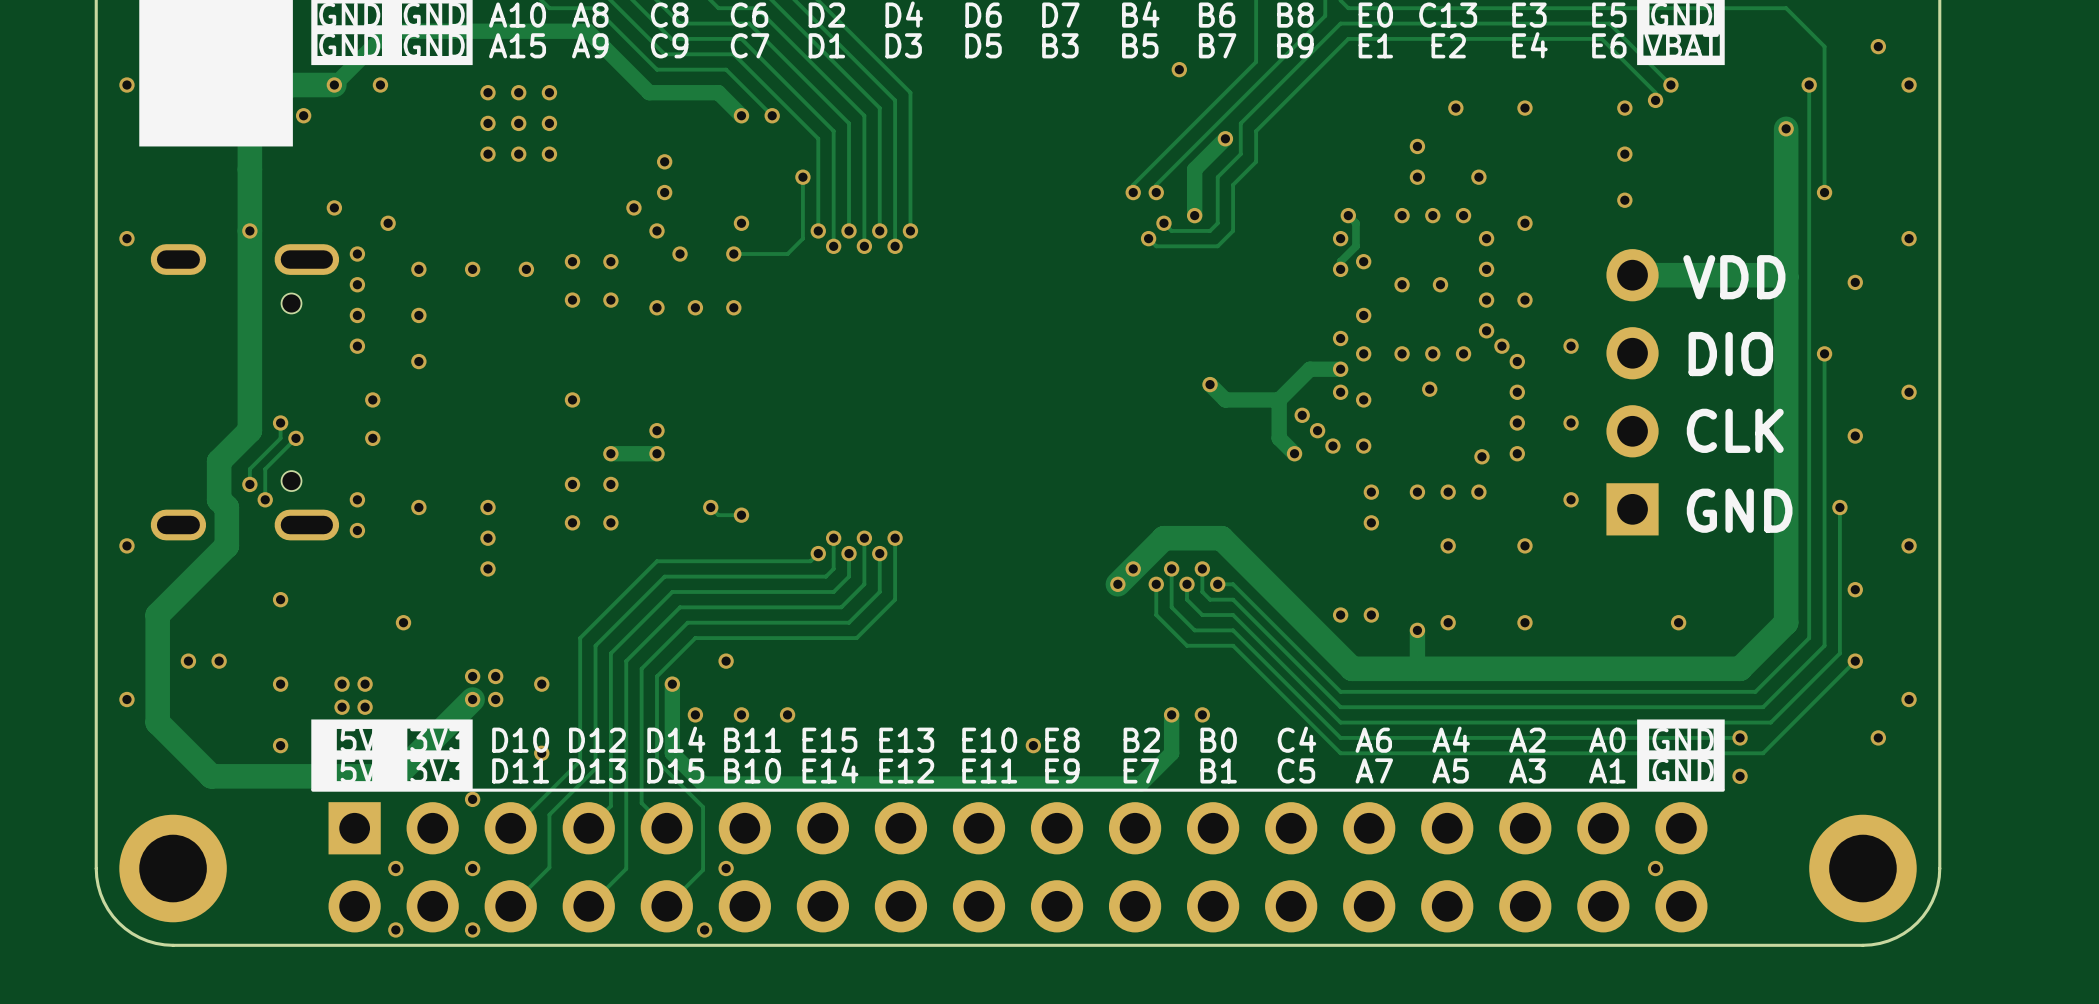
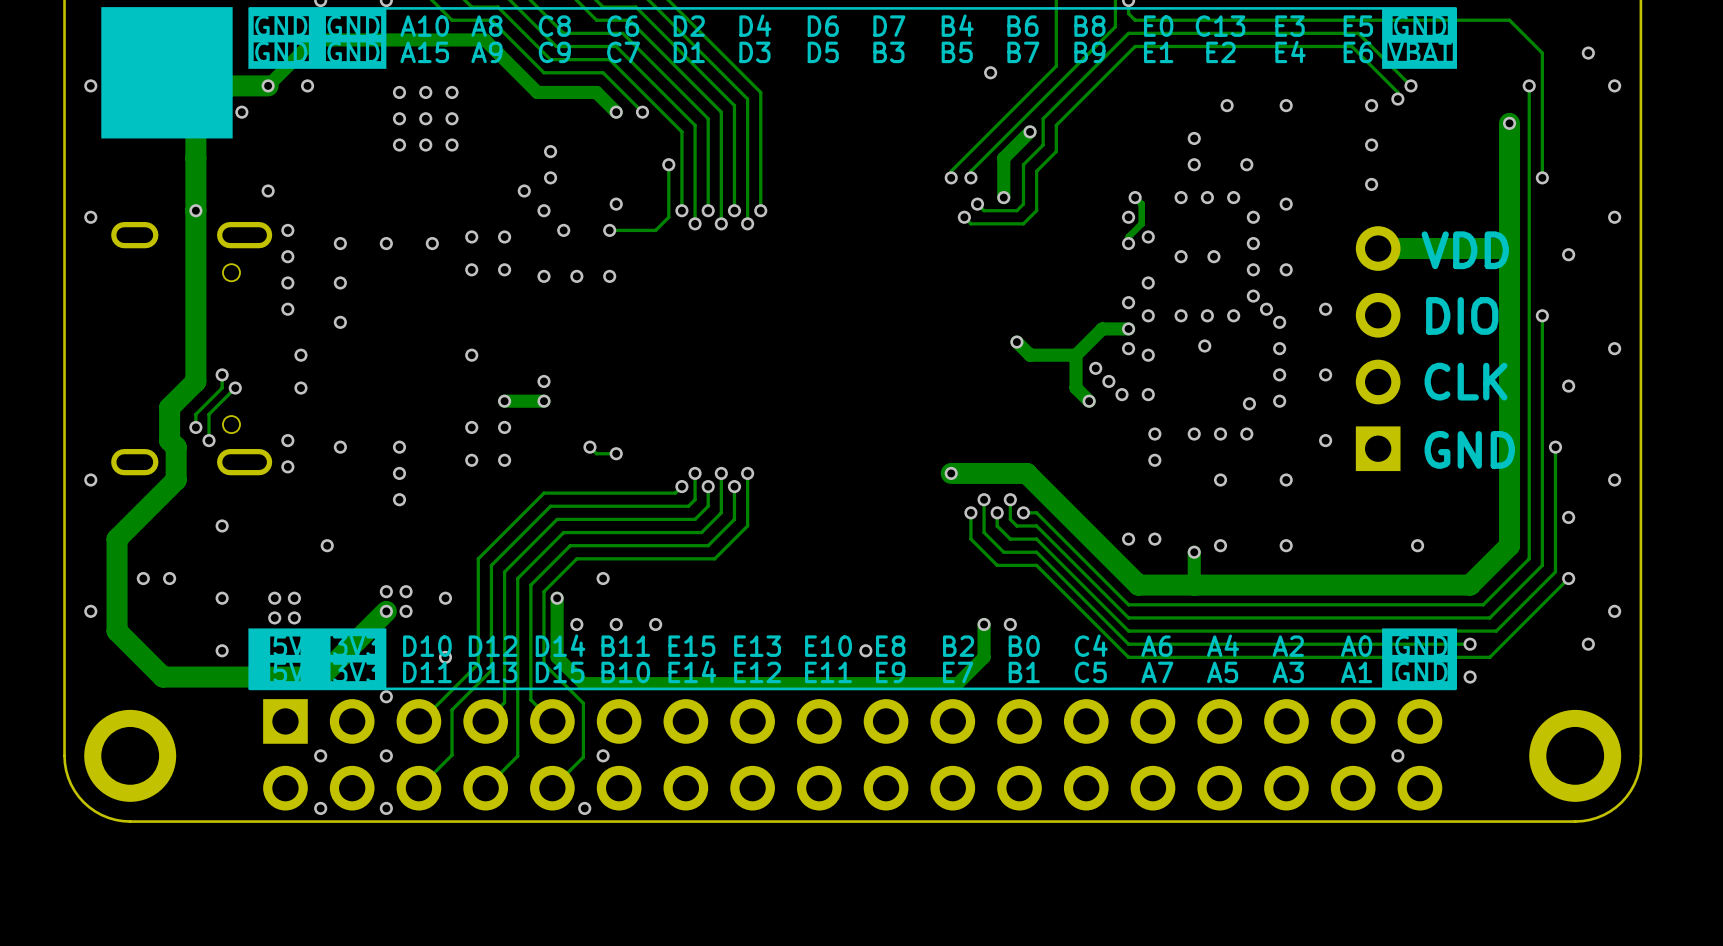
via: (388, 223) -> none
via: none -> (951, 473)
track: (1163, 538) (1117, 584) -> (977, 473) (951, 473)
via: (1133, 568) -> none
via: (1117, 584) -> none

